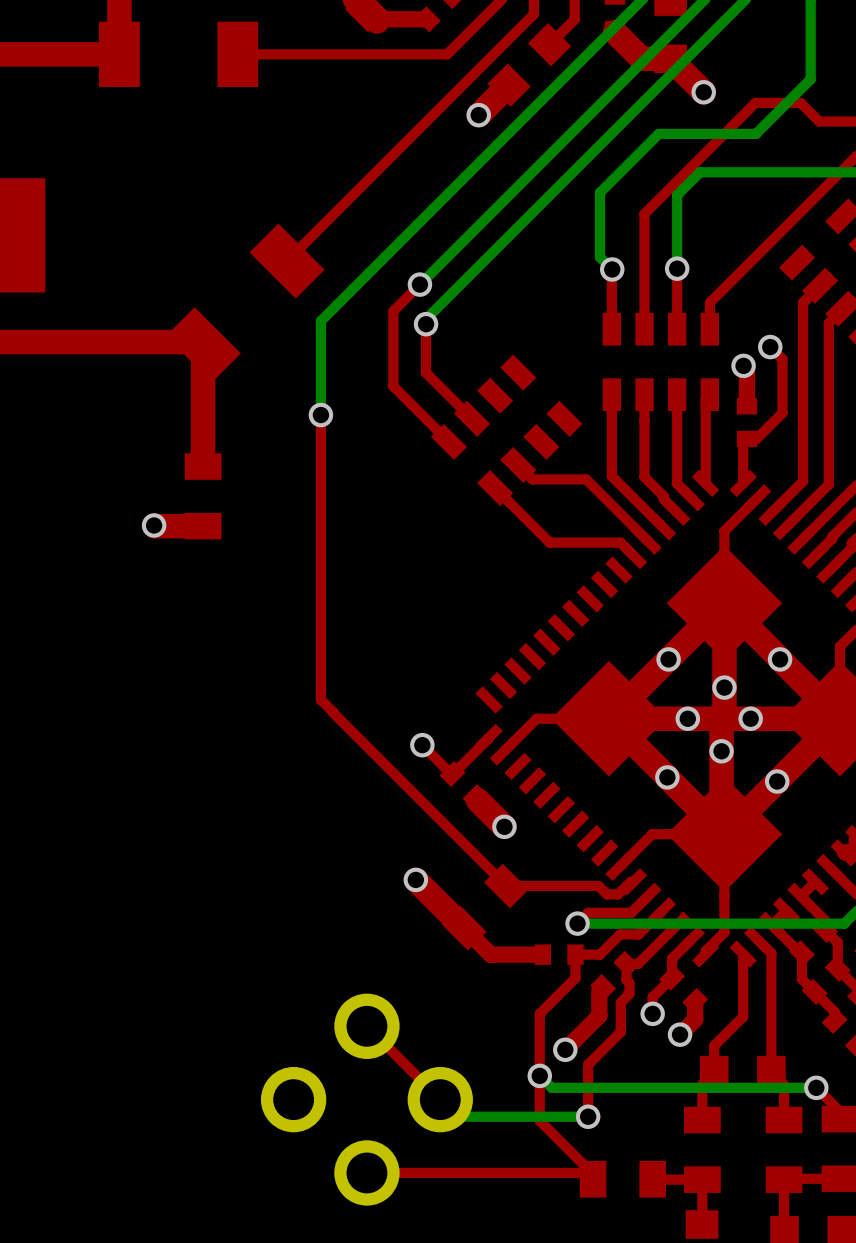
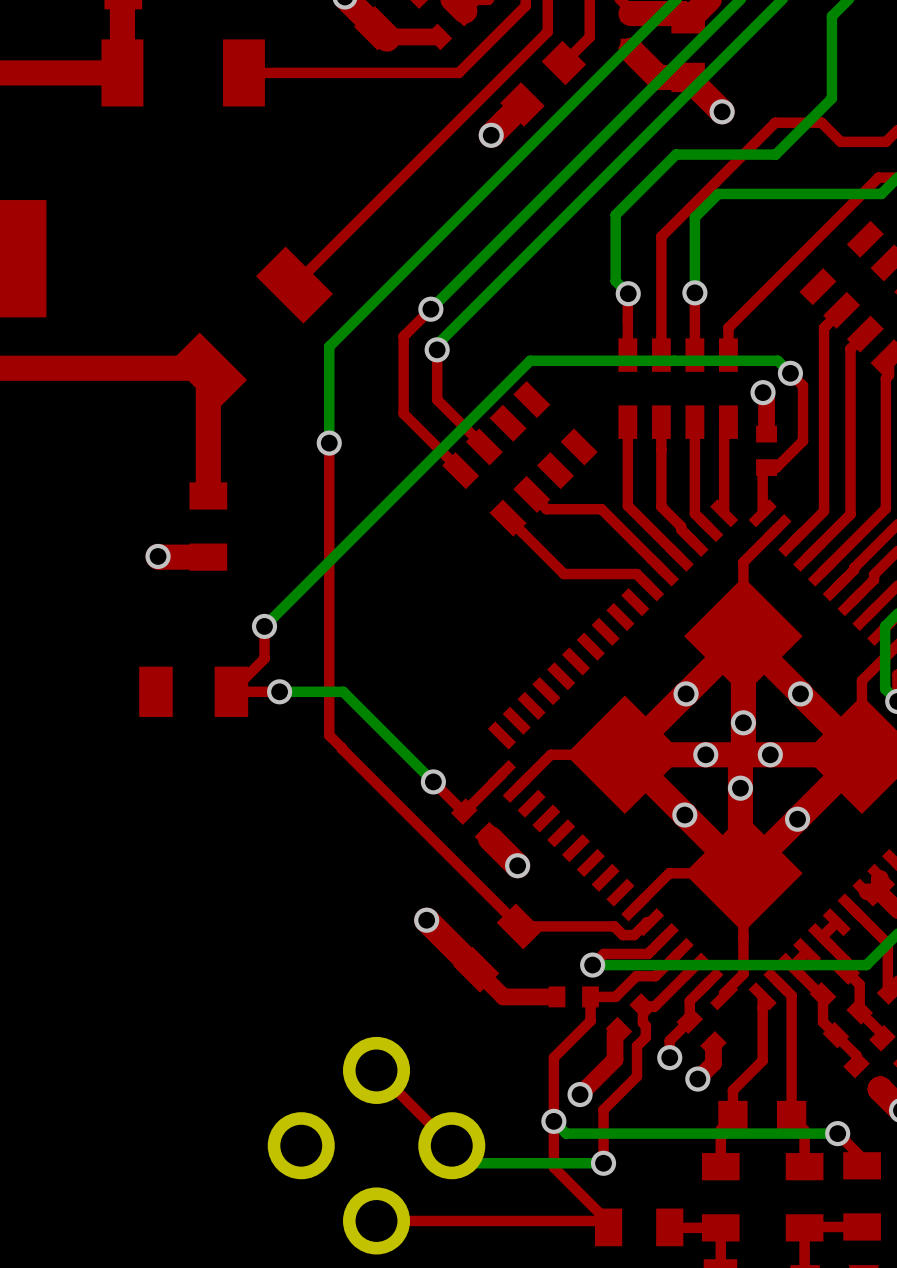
bottom track: none -> (790, 373) (777, 360) (530, 360) (264, 626)
top track: none -> (264, 626) (264, 658) (231, 691) (279, 691)
via: none -> (264, 626)
part: none -> (193, 691)
bottom track: none -> (279, 691) (343, 691) (433, 781)
via: none -> (279, 691)

